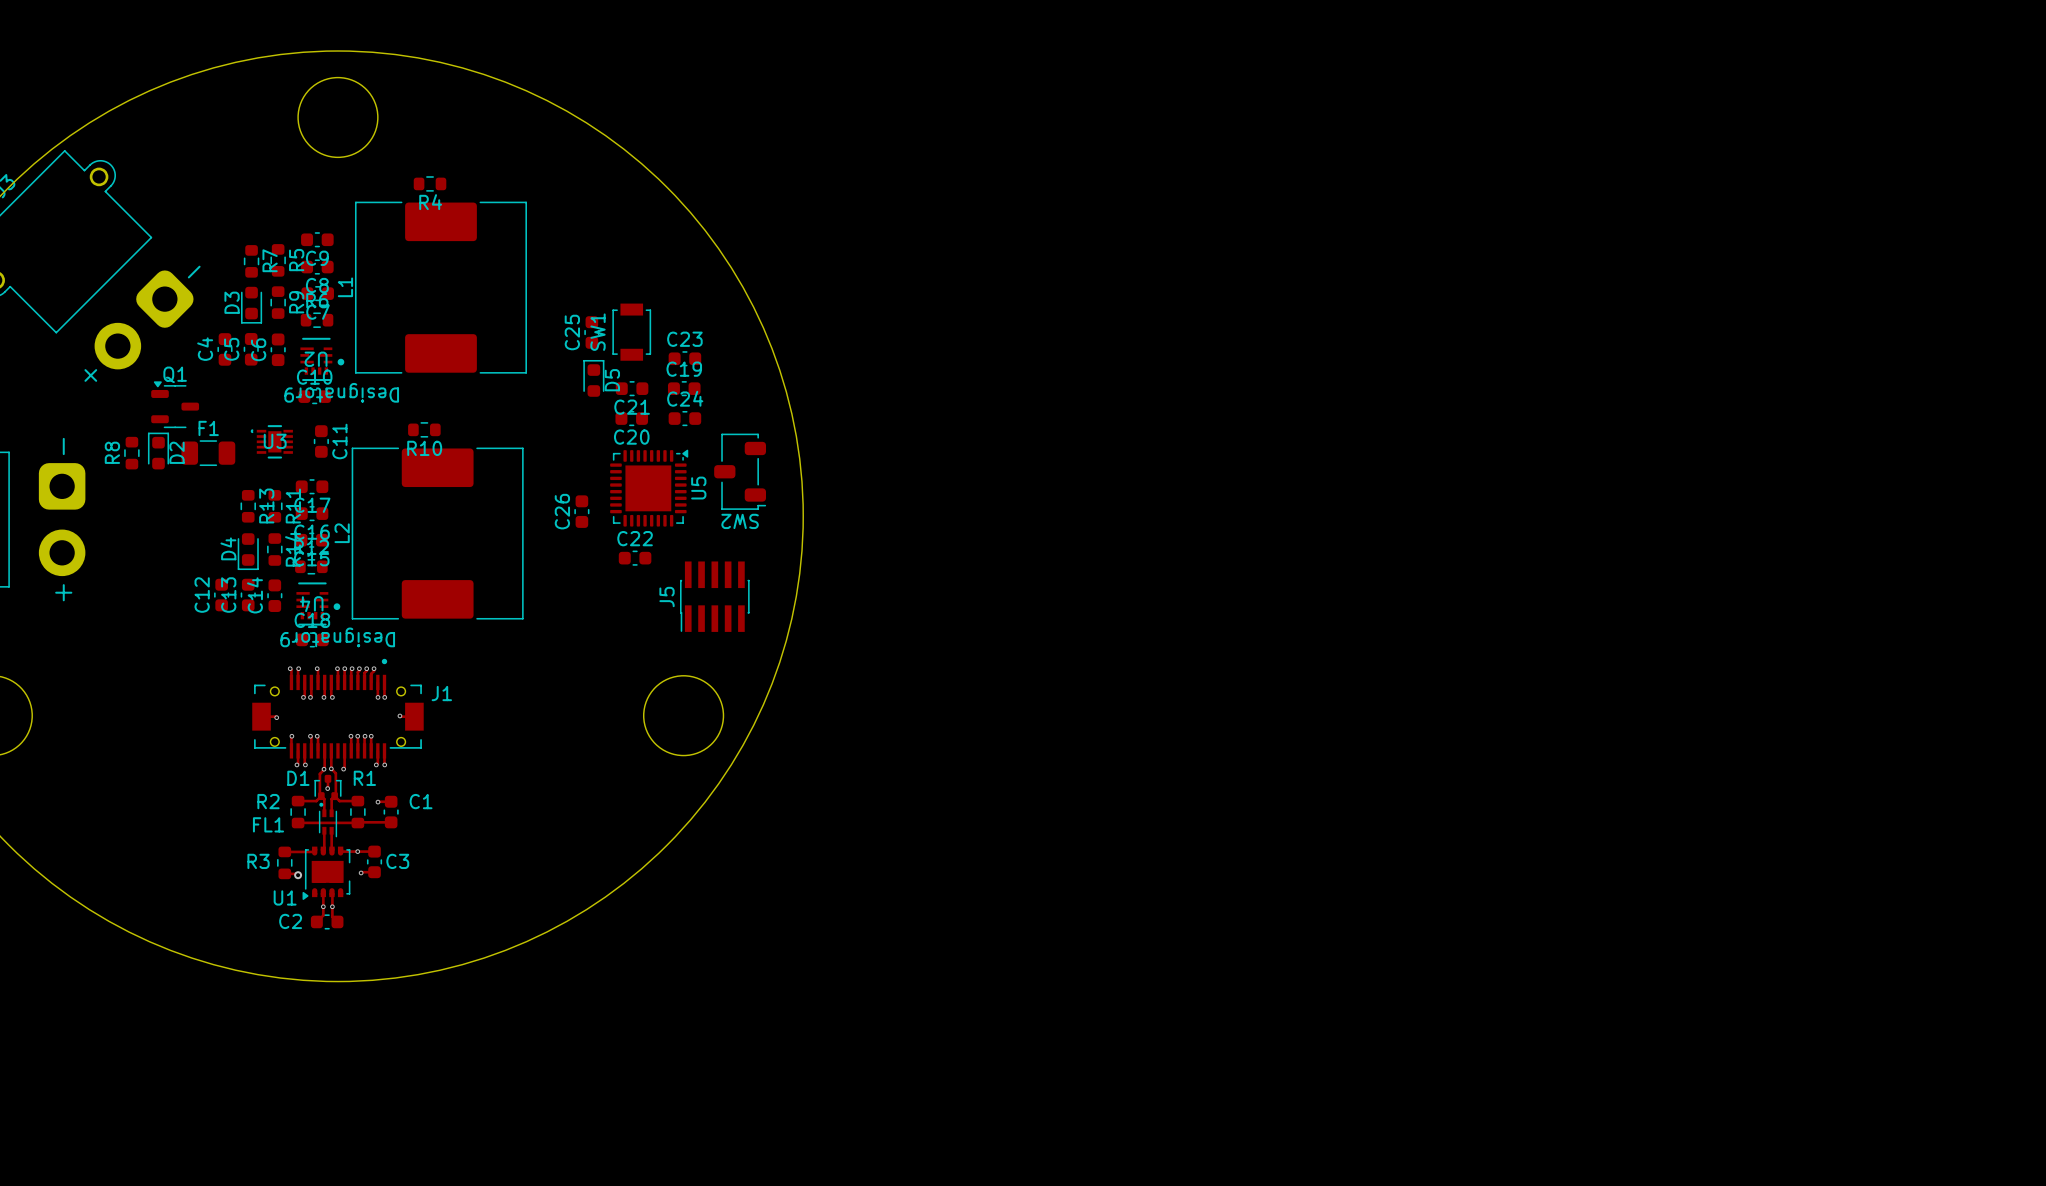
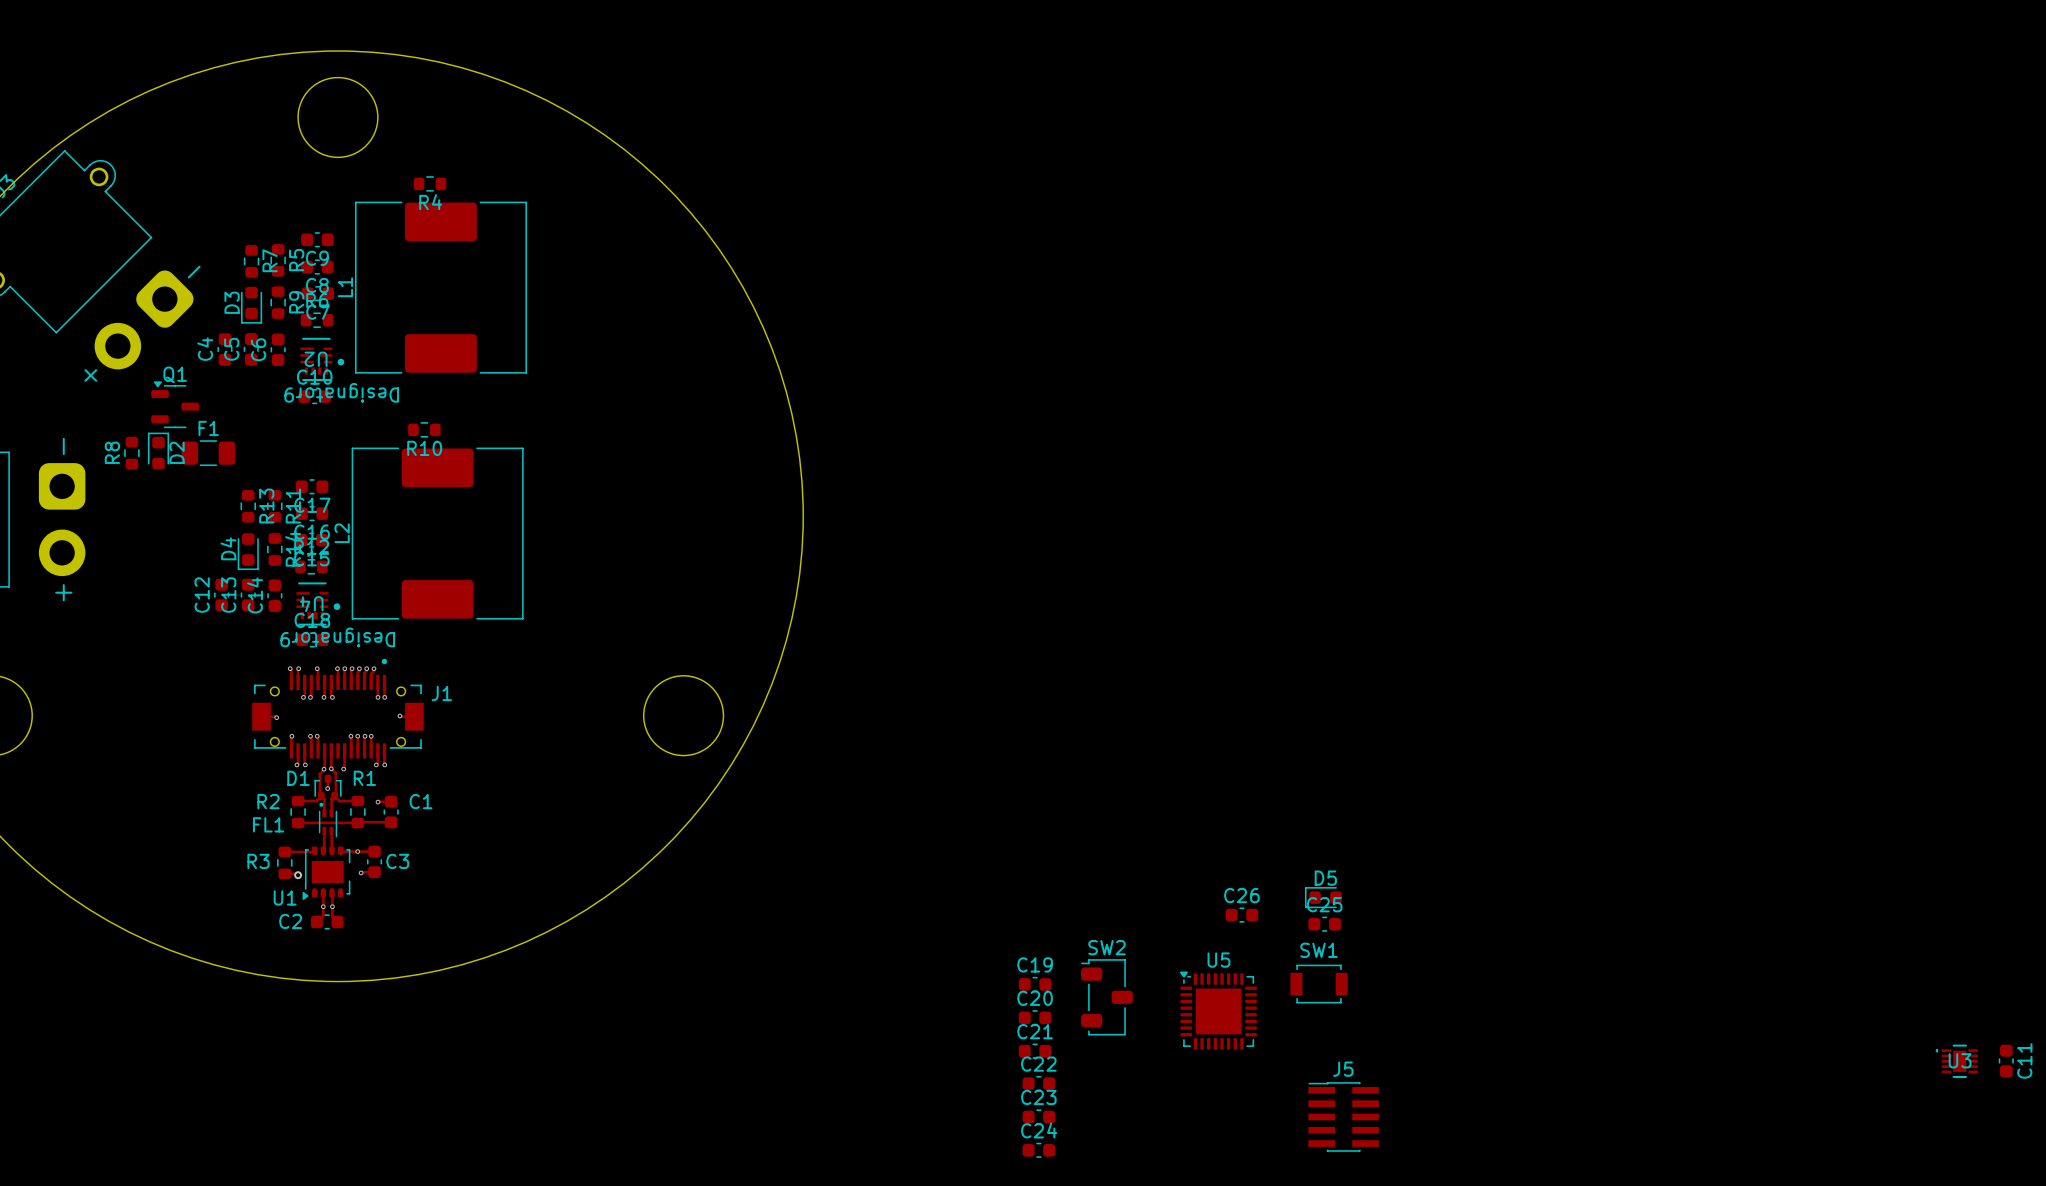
C25 rotation: 0° (591, 332) -> 90° clockwise (1324, 924)
C25 position: (591, 332) -> (1324, 924)
SW1 rotation: 0° (631, 332) -> 90° clockwise (1319, 984)
SW1 position: (631, 332) -> (1319, 984)
C23 position: (684, 358) -> (1038, 1116)
D5 rotation: 0° (593, 378) -> 90° counterclockwise (1323, 897)
D5 position: (593, 378) -> (1323, 897)
C21 position: (632, 388) -> (1035, 1051)
C19 position: (684, 388) -> (1035, 984)
C21 name position: C21 (632, 407) -> C21 (1035, 1031)
C20 position: (631, 418) -> (1035, 1017)
C24 position: (684, 418) -> (1038, 1150)
C20 name position: C20 (631, 437) -> C20 (1035, 998)
U3 position: (271, 441) -> (1956, 1061)
C11 position: (321, 441) -> (2006, 1060)
SW2 rotation: 0° (740, 471) -> 180° (1106, 997)
SW2 position: (740, 471) -> (1106, 997)
U5 rotation: 0° (649, 488) -> 90° counterclockwise (1218, 1010)
U5 position: (649, 488) -> (1218, 1010)
C26 rotation: 0° (581, 511) -> 90° clockwise (1241, 915)
C26 position: (581, 511) -> (1241, 915)
C22 position: (635, 558) -> (1038, 1083)
J5 rotation: 0° (714, 596) -> 90° clockwise (1343, 1116)
J5 position: (714, 596) -> (1343, 1116)

